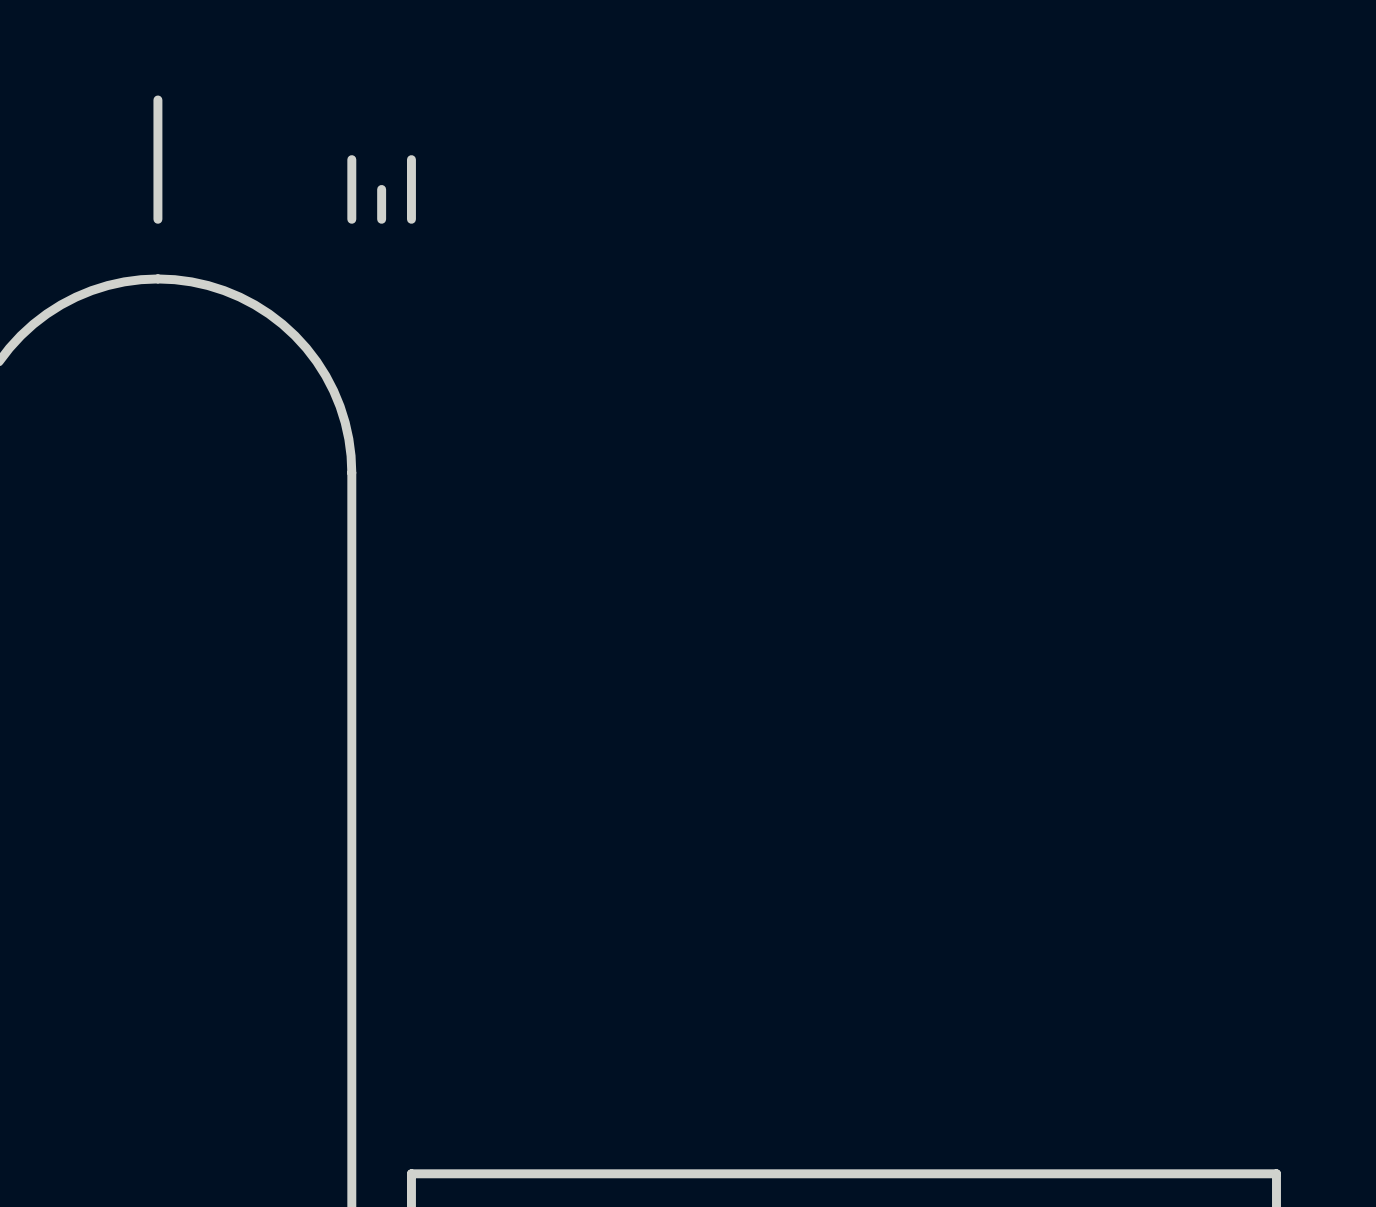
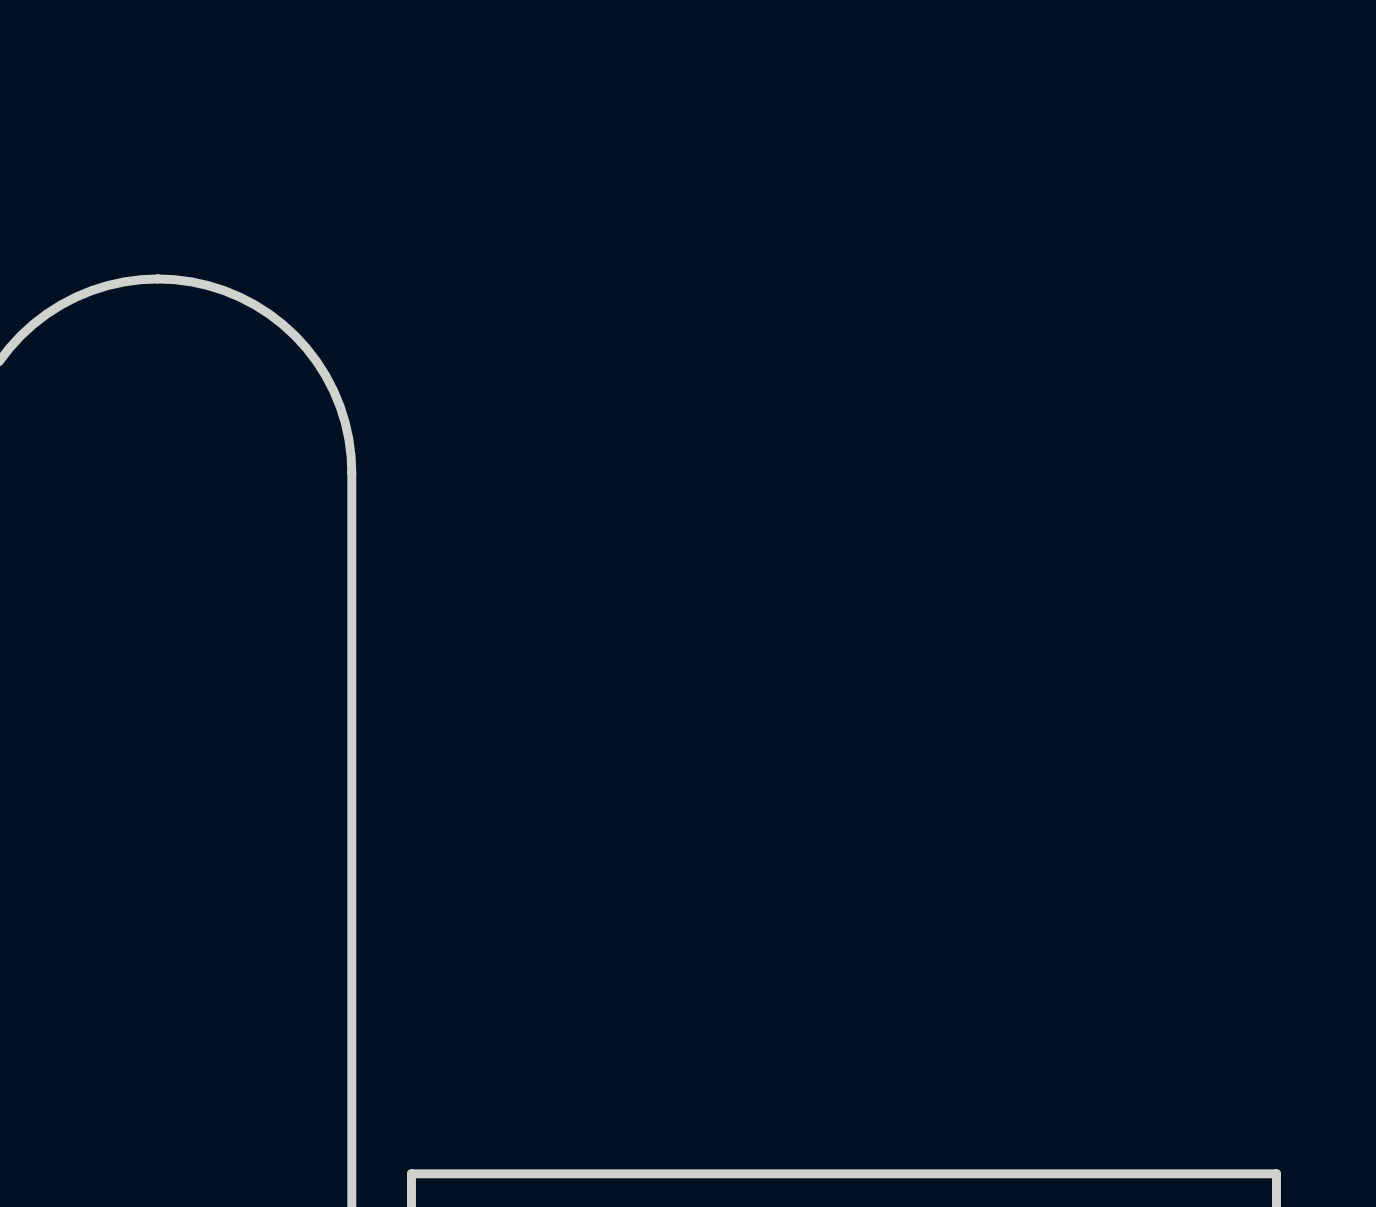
board edge: (157, 99) (157, 219) -> none
board edge: (351, 159) (351, 219) -> none
board edge: (411, 159) (411, 219) -> none
board edge: (381, 189) (381, 219) -> none

